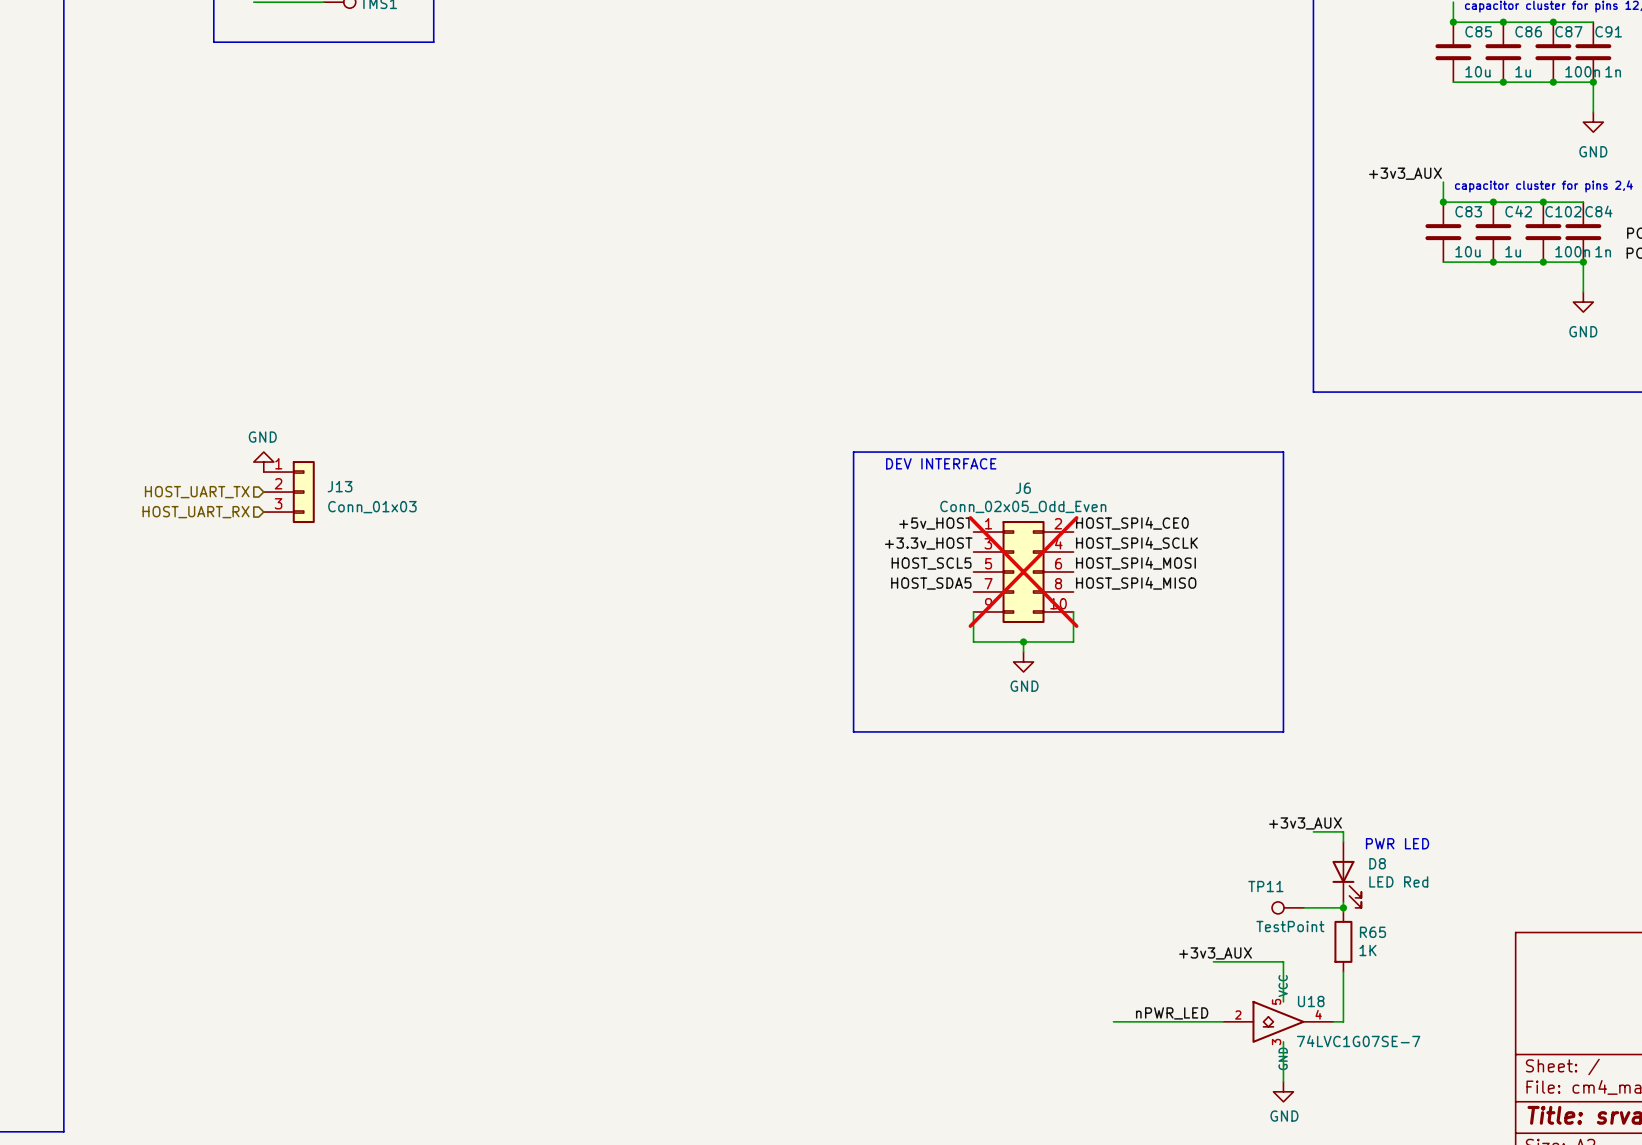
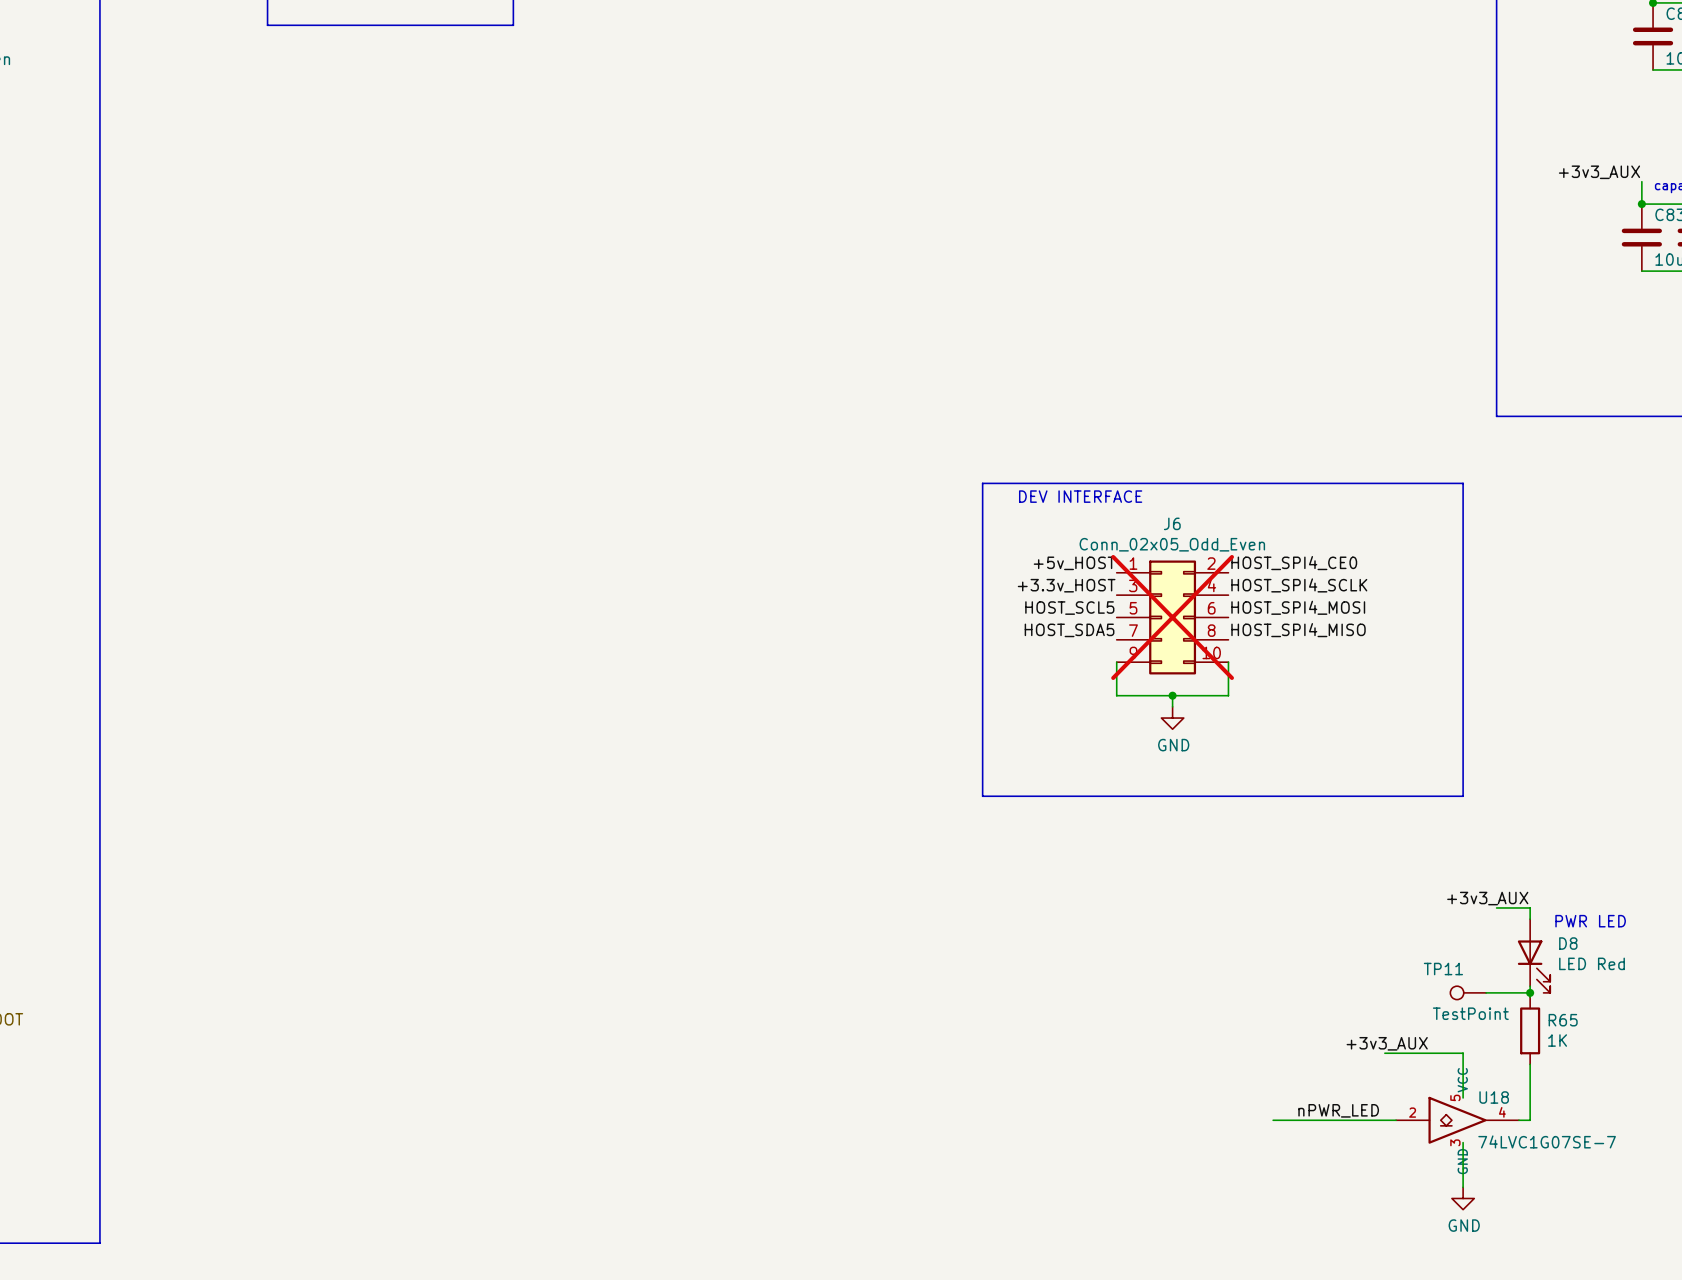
power symbol: GND (263, 462) -> none
hierarchical label: HOST_UART_TX (197, 492) -> none
J13: Conn_01x03 (289, 492) -> none
hierarchical label: HOST_UART_RX (196, 512) -> none

